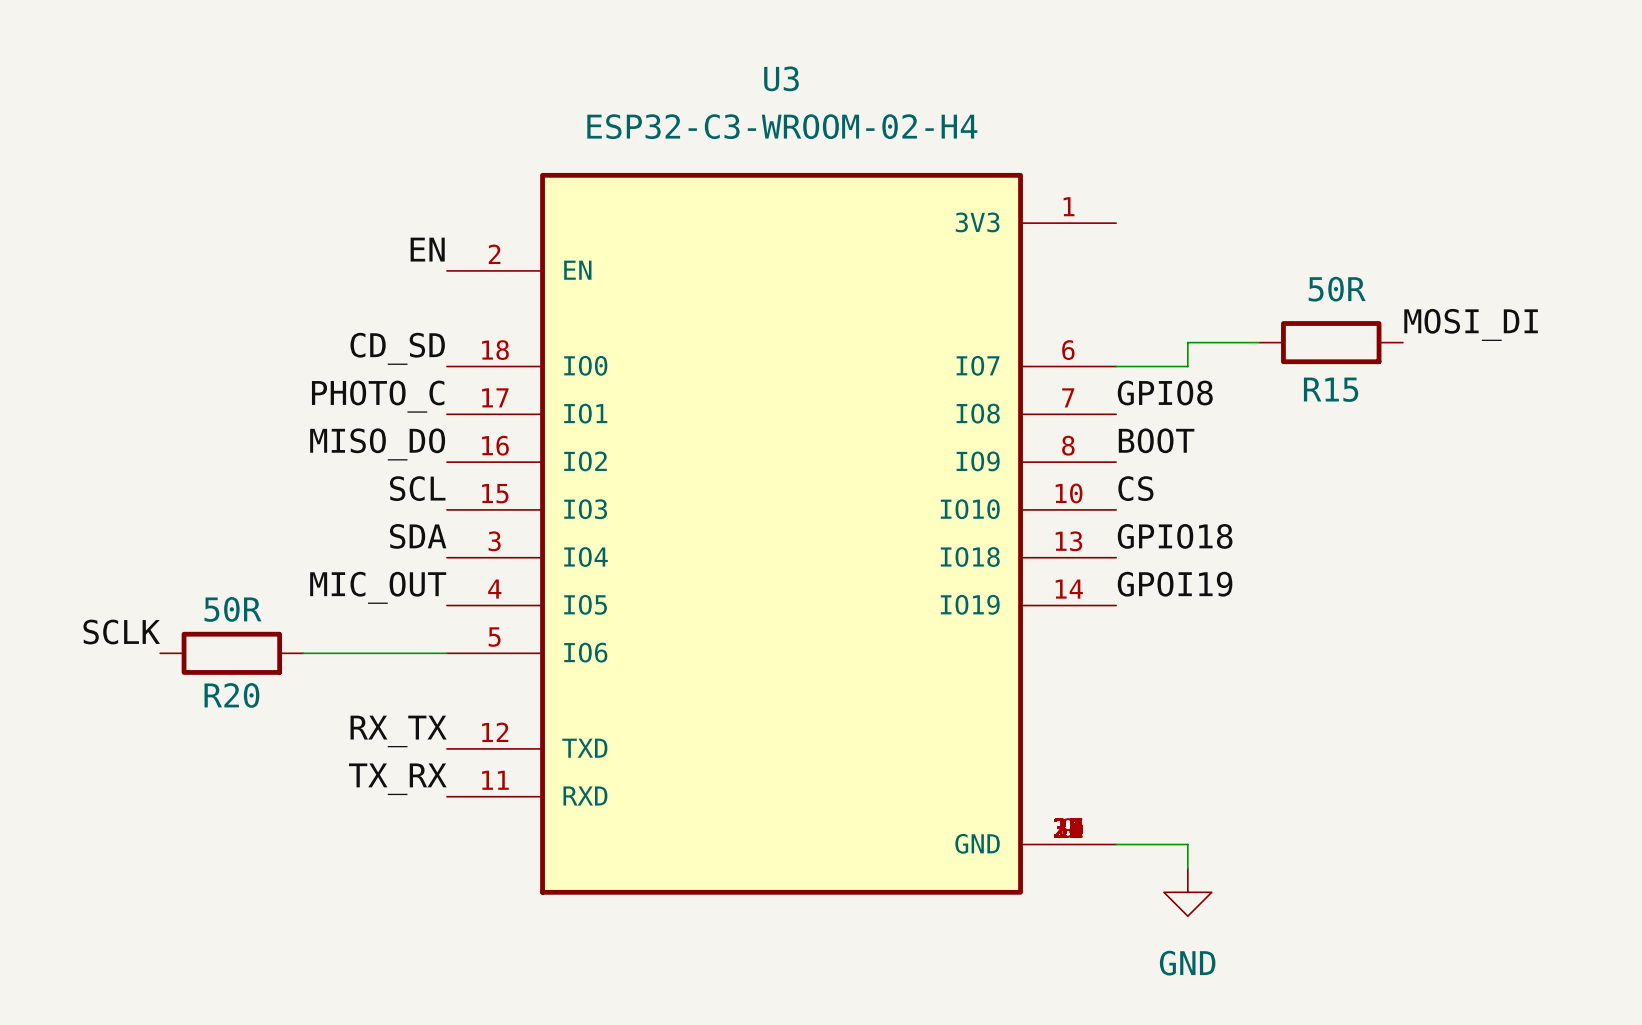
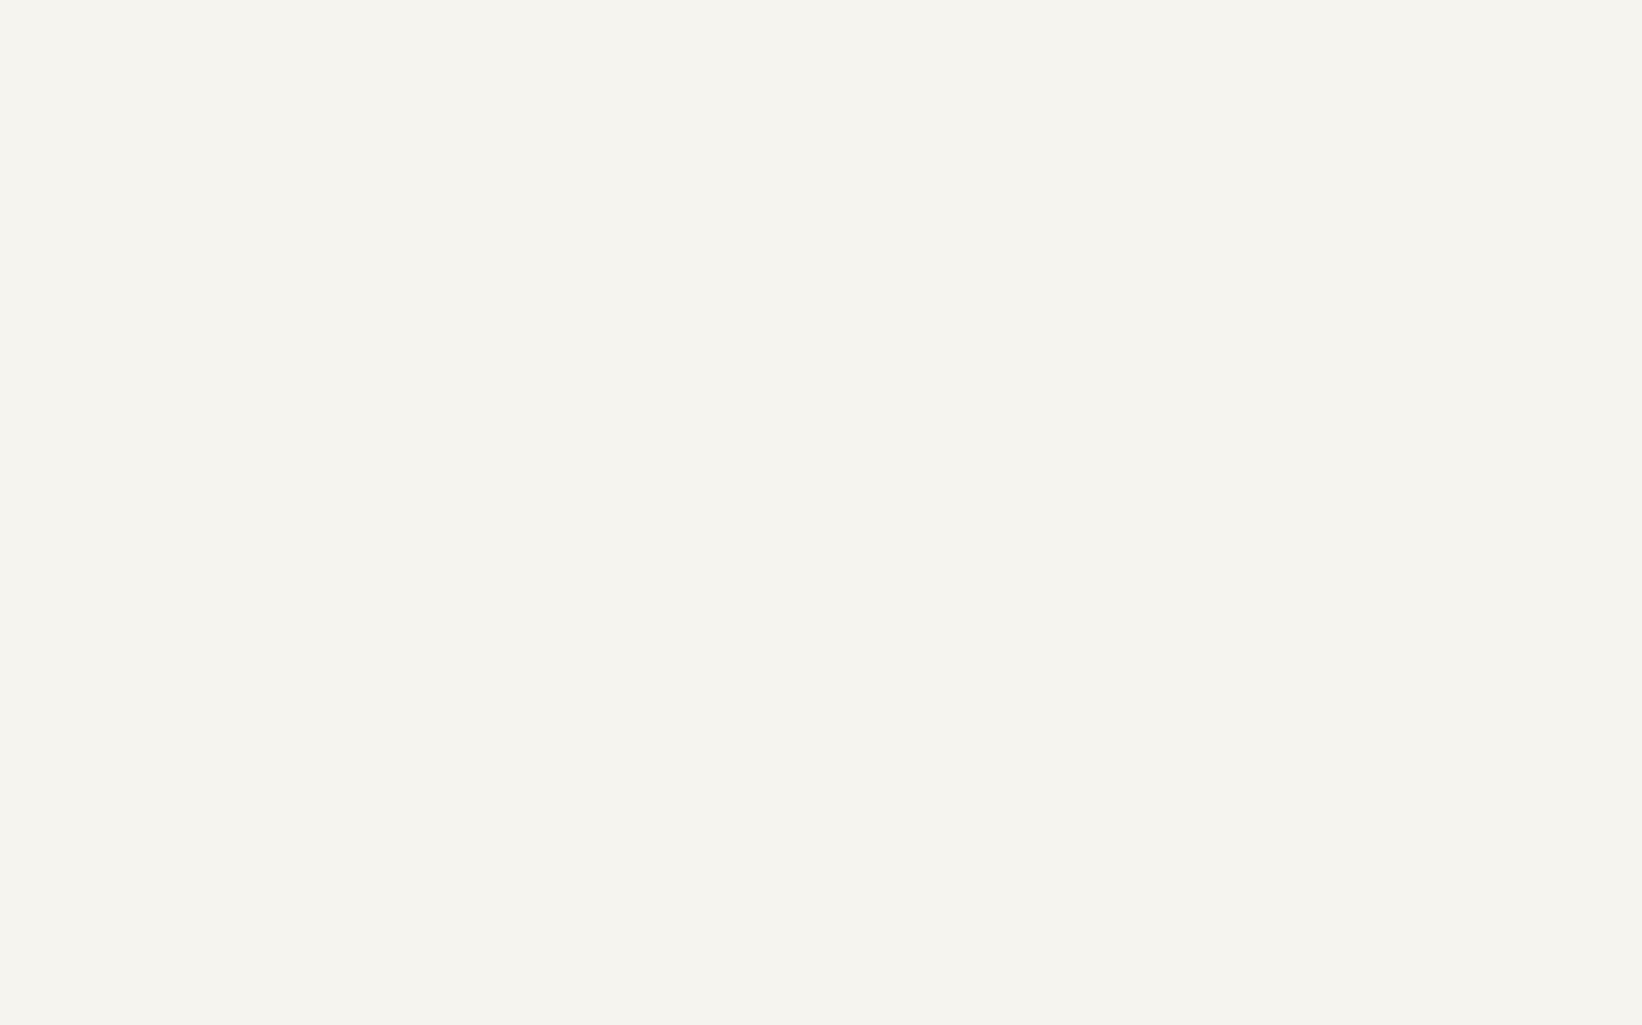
label: EN (427, 249) -> none
label: MOSI_DI (1471, 324) -> none
wire: (1259, 342) (1187, 342) (1187, 366) (1116, 366) -> none
R15: 50R (1331, 342) -> none
label: CD_SD (397, 348) -> none
label: GPIO8 (1165, 393) -> none
label: PHOTO_C (378, 396) -> none
label: BOOT (1156, 440) -> none
label: MISO_DO (377, 444) -> none
label: SCL (417, 488) -> none
label: CS (1135, 488) -> none
U3: ESP32-C3-WROOM-02-H4 (781, 533) -> none
label: SDA (418, 536) -> none
label: GPIO18 (1175, 536) -> none
label: GPOI19 (1175, 584) -> none
label: MIC_OUT (378, 587) -> none
label: SCLK (121, 632) -> none
R20: 50R (231, 653) -> none
wire: (303, 653) (446, 653) -> none
label: RX_TX (398, 731) -> none
label: TX_RX (397, 779) -> none
wire: (1116, 844) (1187, 844) (1187, 868) -> none
power symbol: GND (1187, 892) -> none

